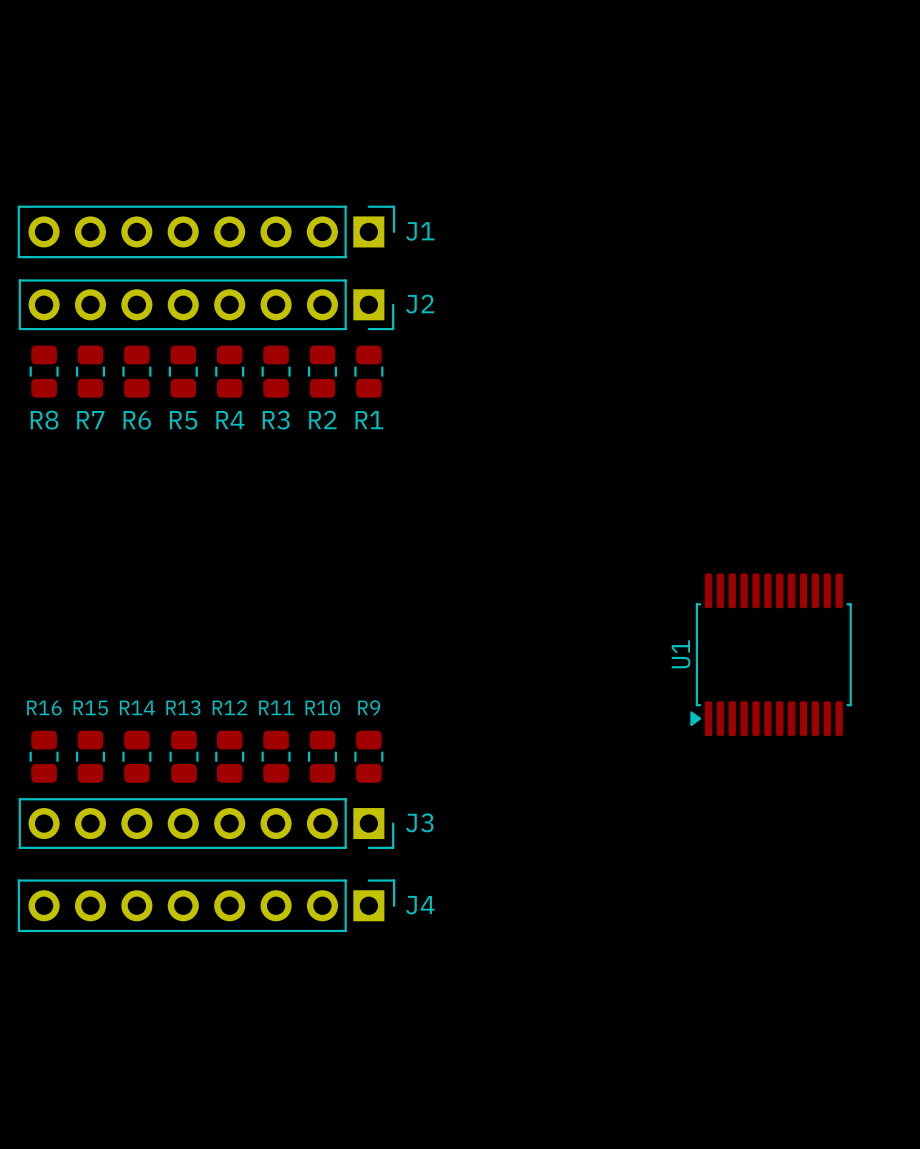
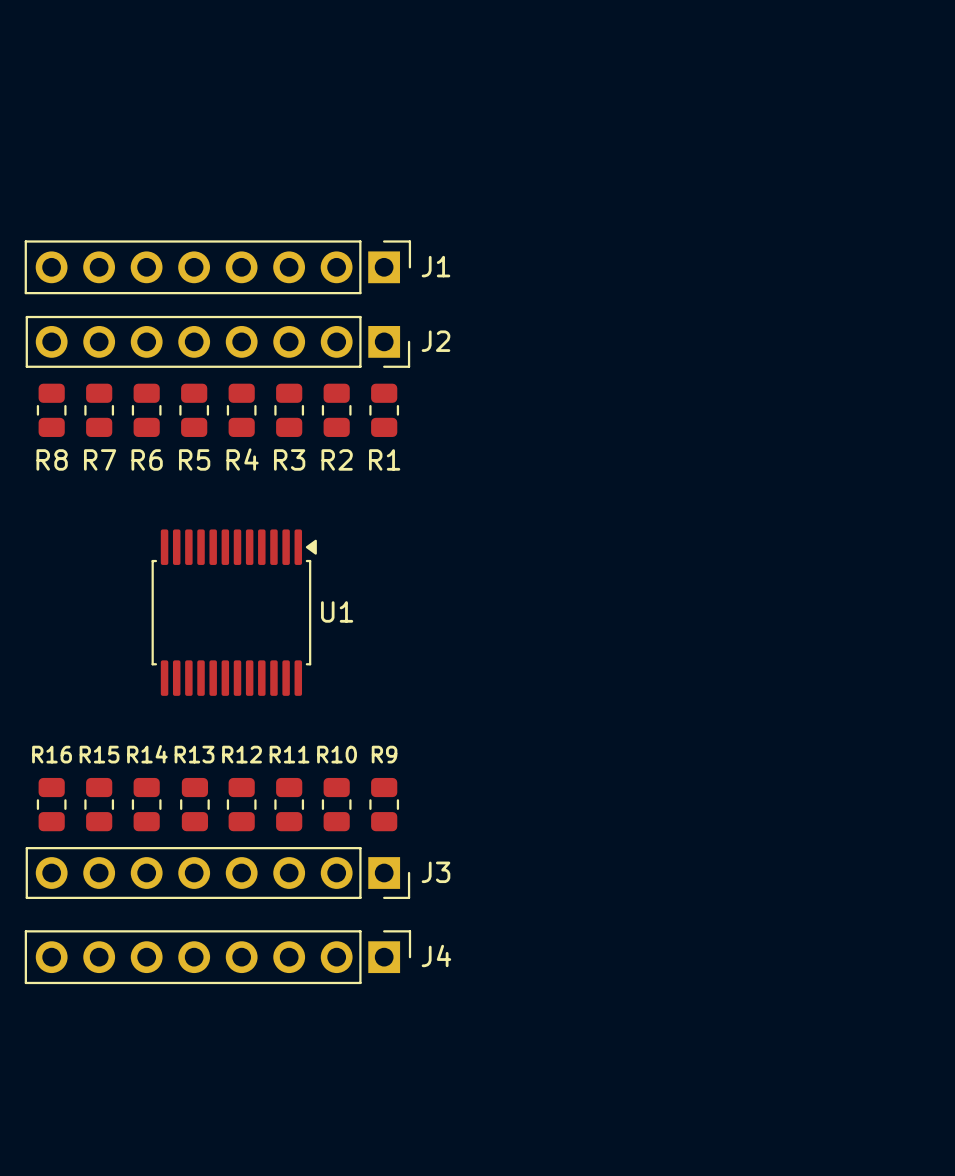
U1 rotation: 0° (771, 654) -> 180° (234, 612)
U1 position: (771, 654) -> (234, 612)

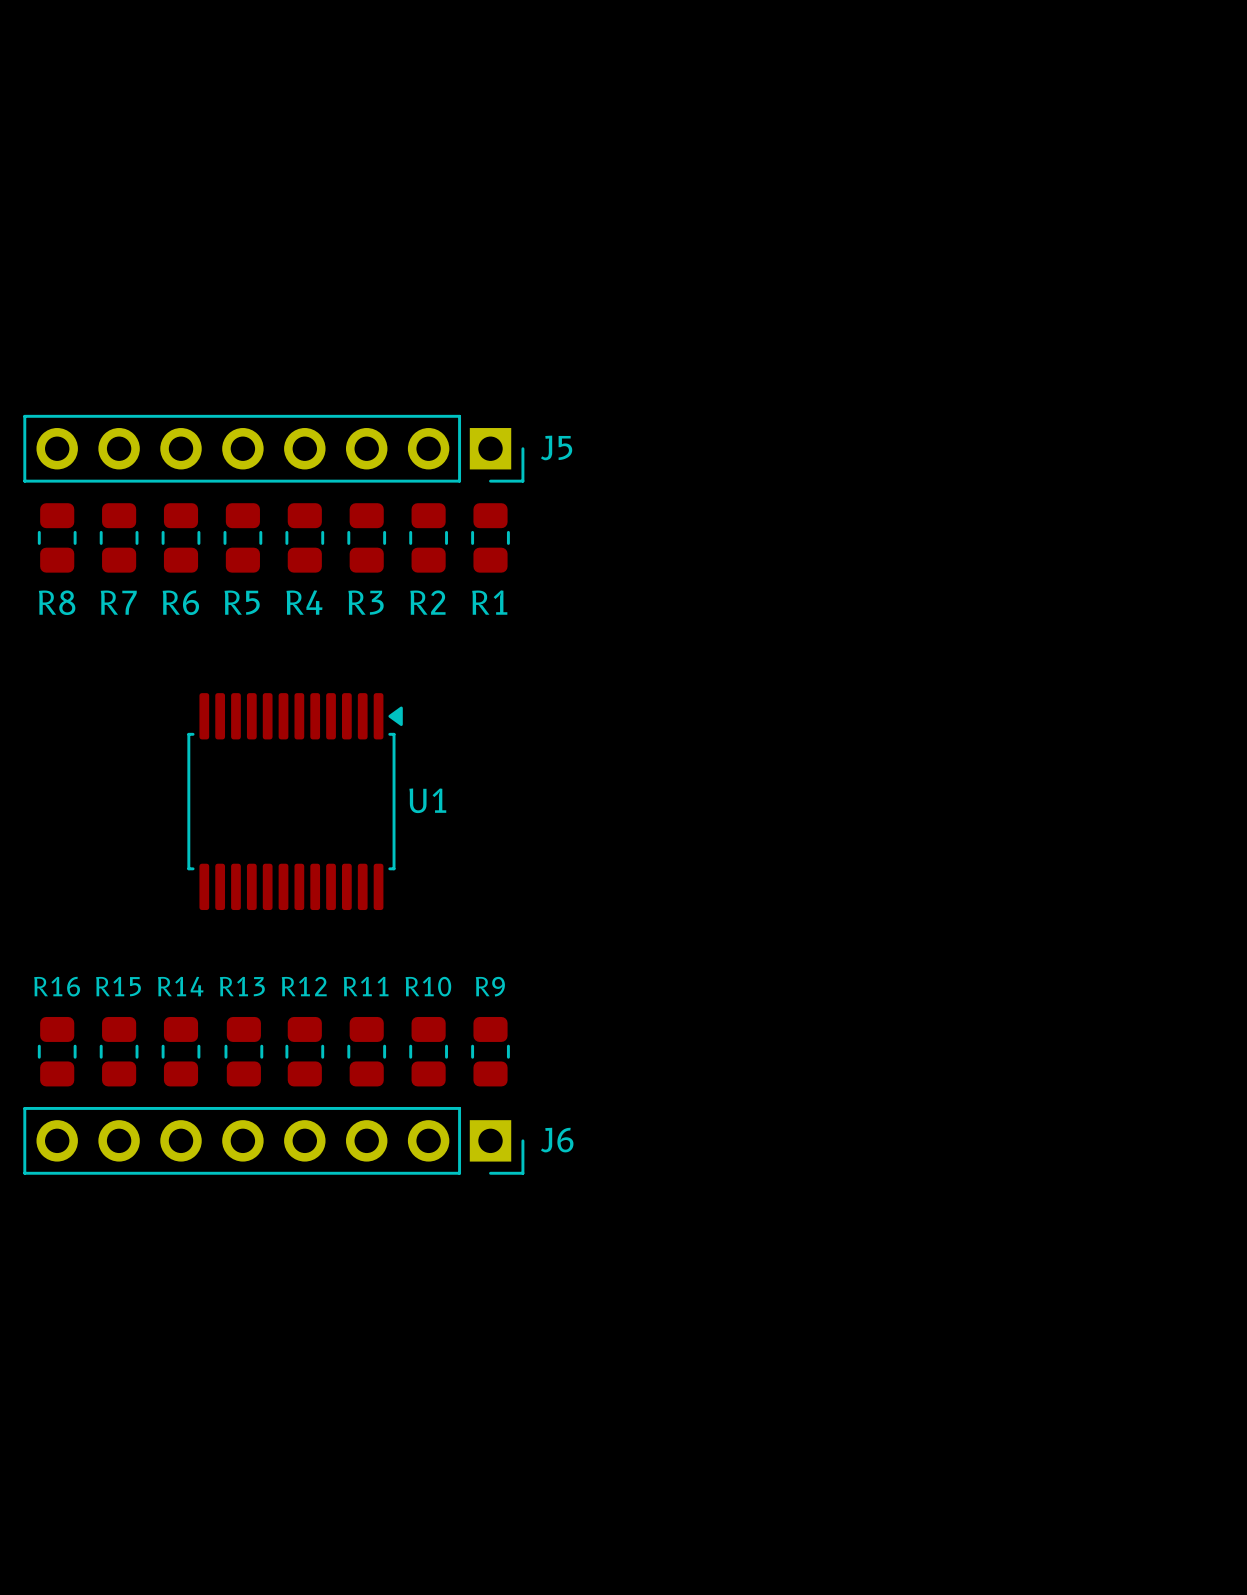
J1: (217, 267) -> none
J2 name: J2 (435, 341) -> J5 (556, 447)
J3 name: J3 (435, 872) -> J6 (557, 1140)
J4: (217, 957) -> none

